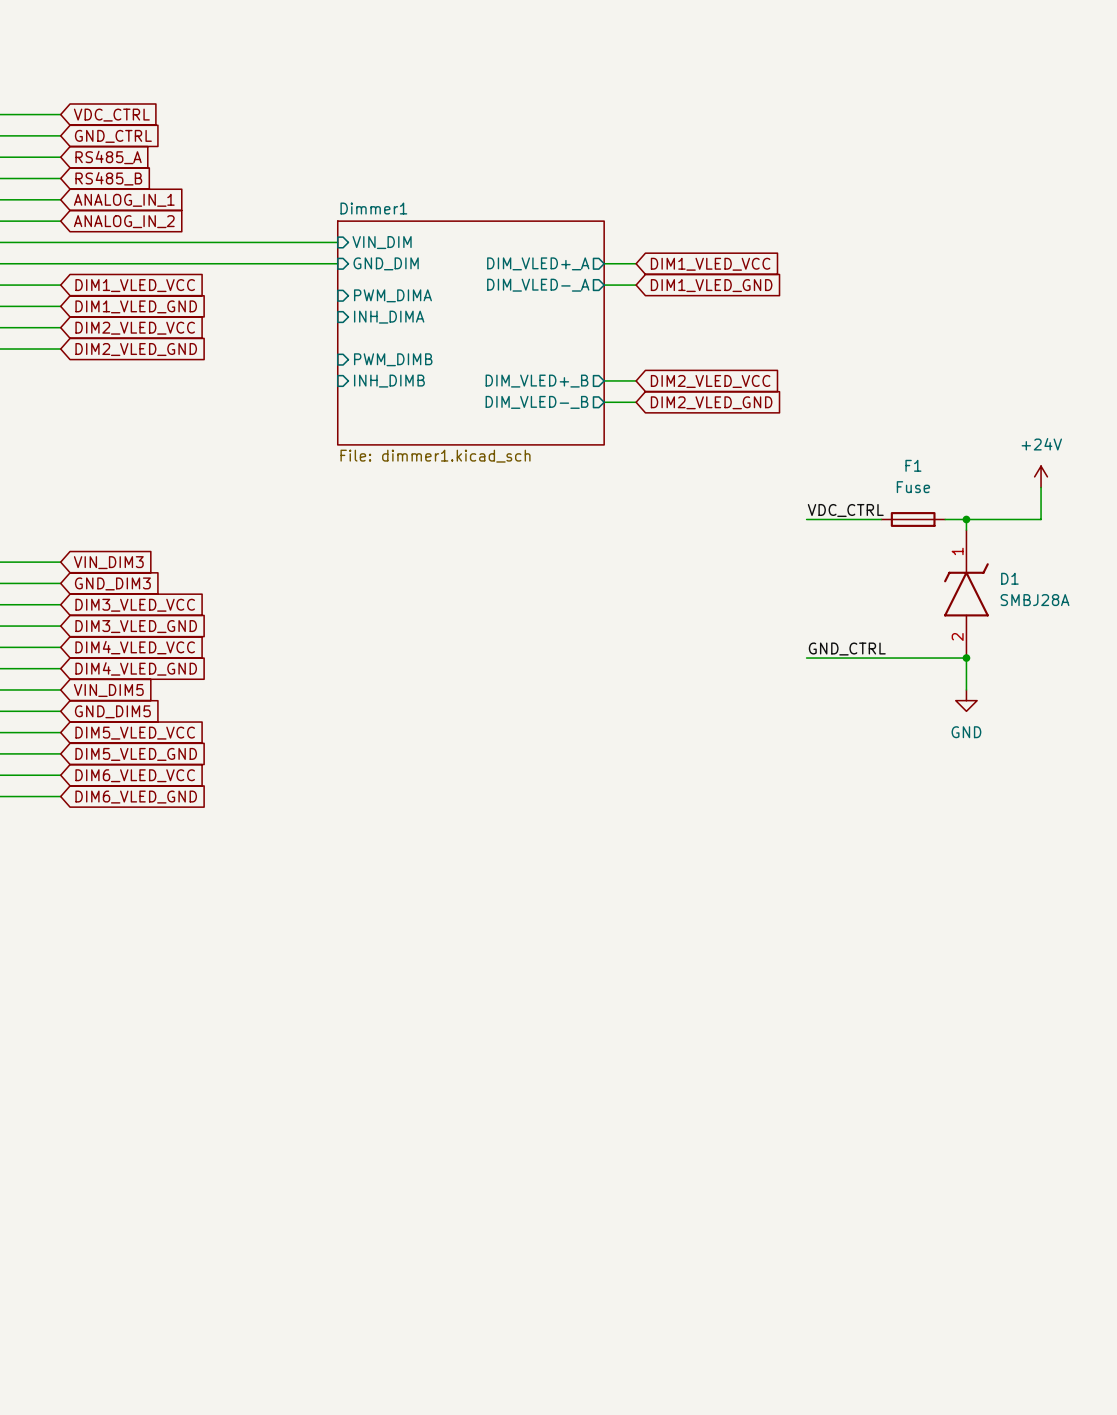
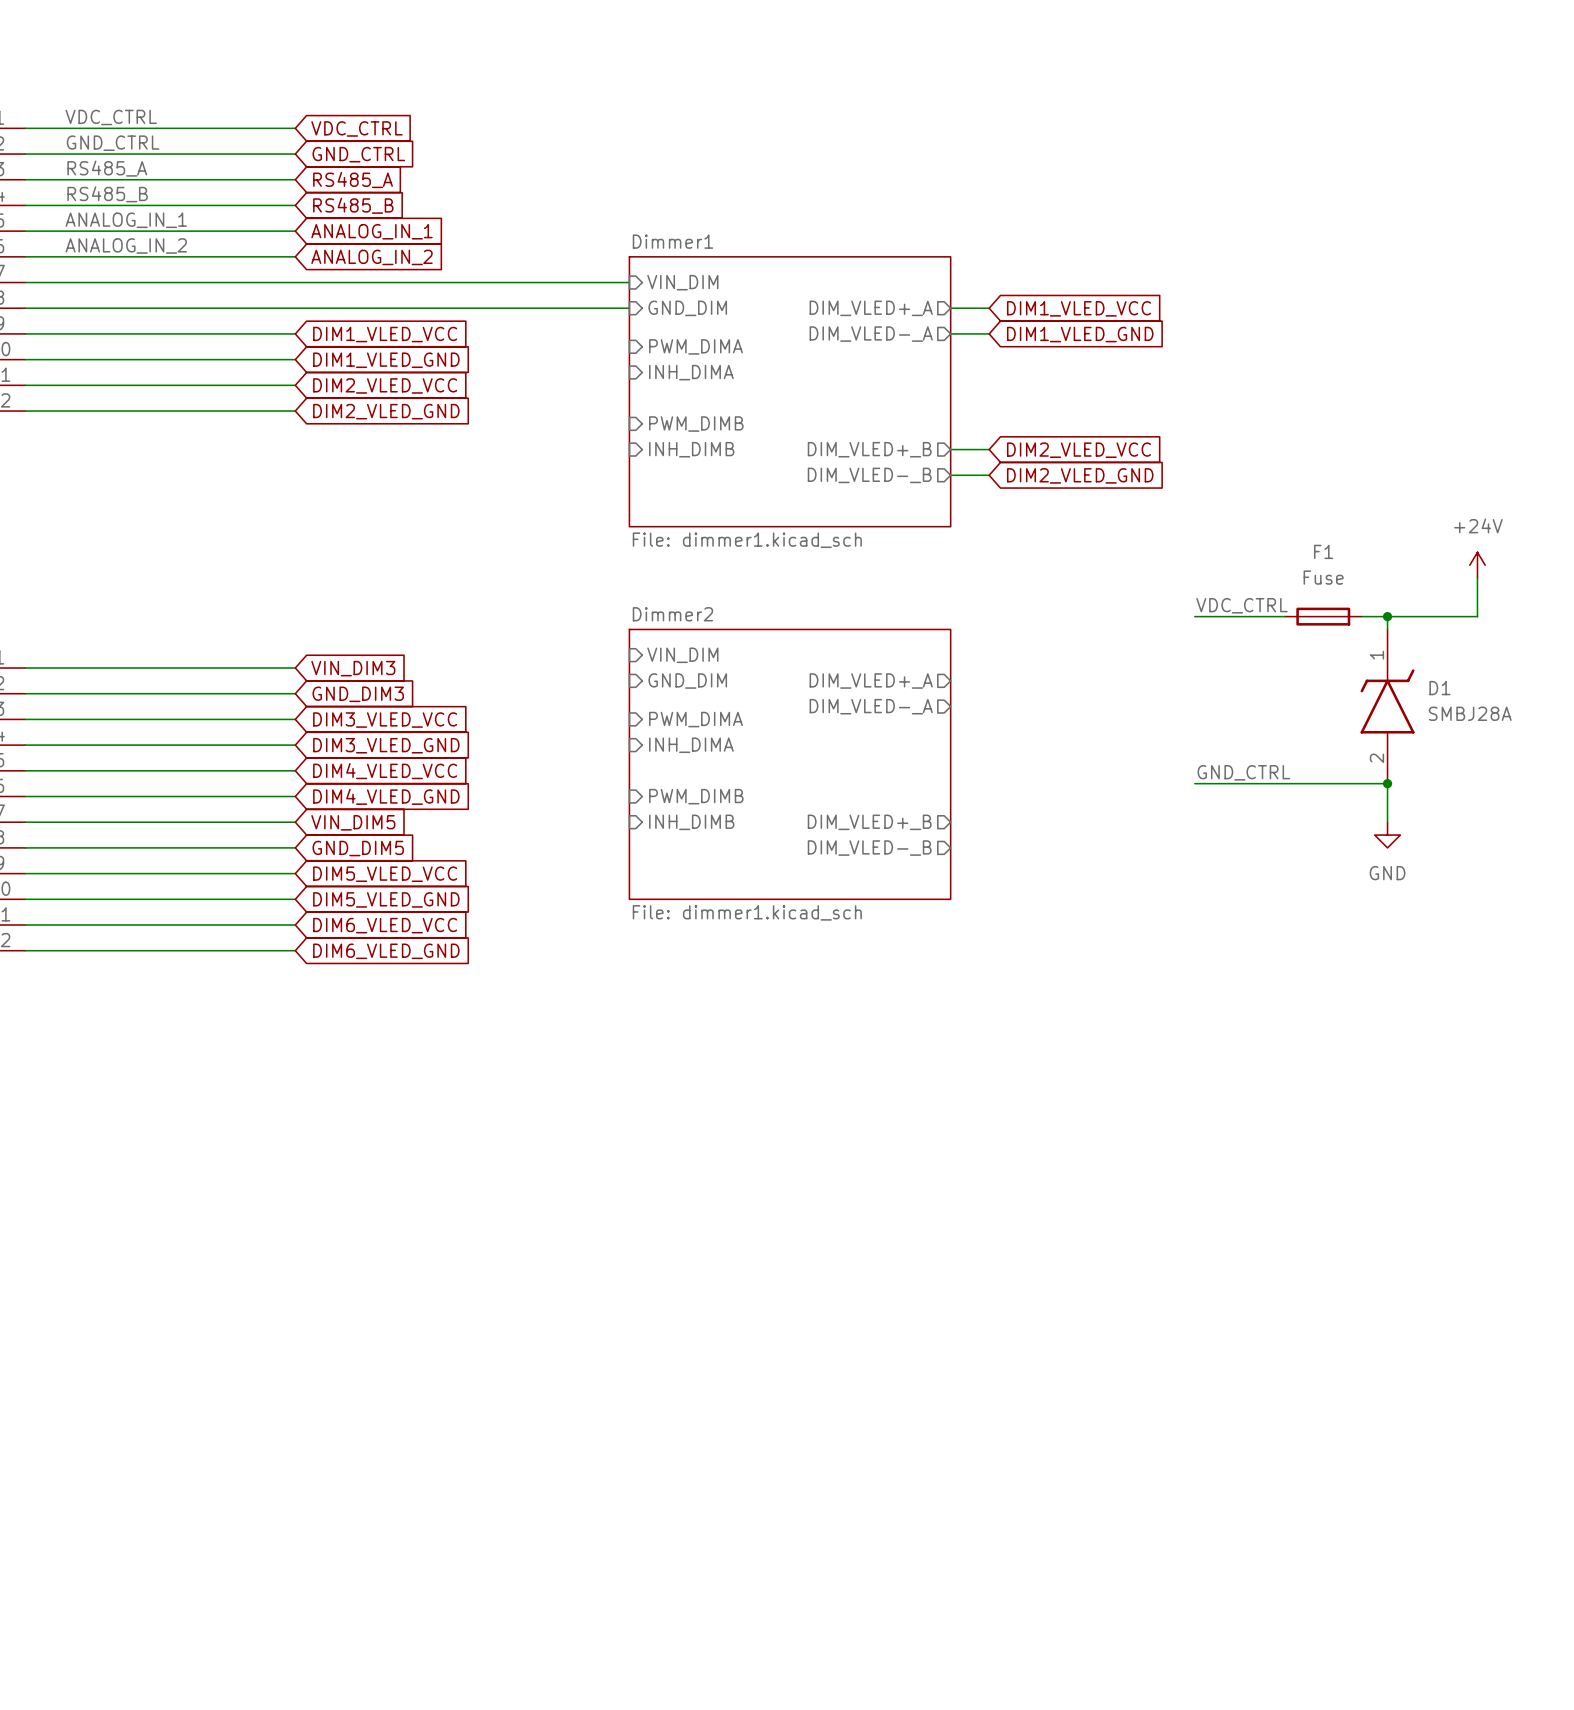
sheet pin: none -> VIN_DIM (682, 655)
sheet pin: none -> GND_DIM (687, 681)
sheet pin: none -> DIM_VLED+_A (871, 681)
sheet pin: none -> DIM_VLED-_A (871, 706)
sheet pin: none -> PWM_DIMA (696, 719)
sheet pin: none -> INH_DIMA (691, 745)
sheet Dimmer2: none -> File: dimmer1.kicad_sch (790, 764)
sheet pin: none -> PWM_DIMB (696, 796)
sheet pin: none -> INH_DIMB (691, 822)
sheet pin: none -> DIM_VLED+_B (869, 822)
sheet pin: none -> DIM_VLED-_B (869, 848)

